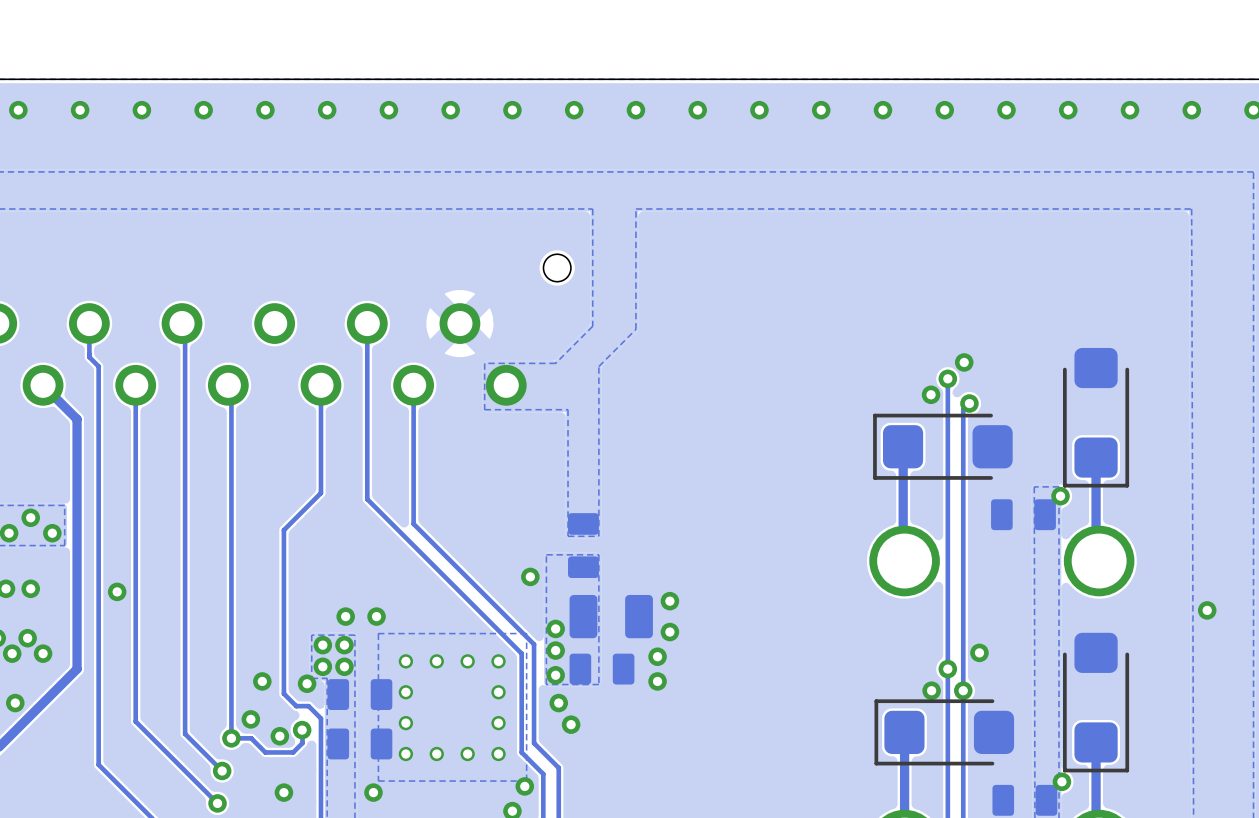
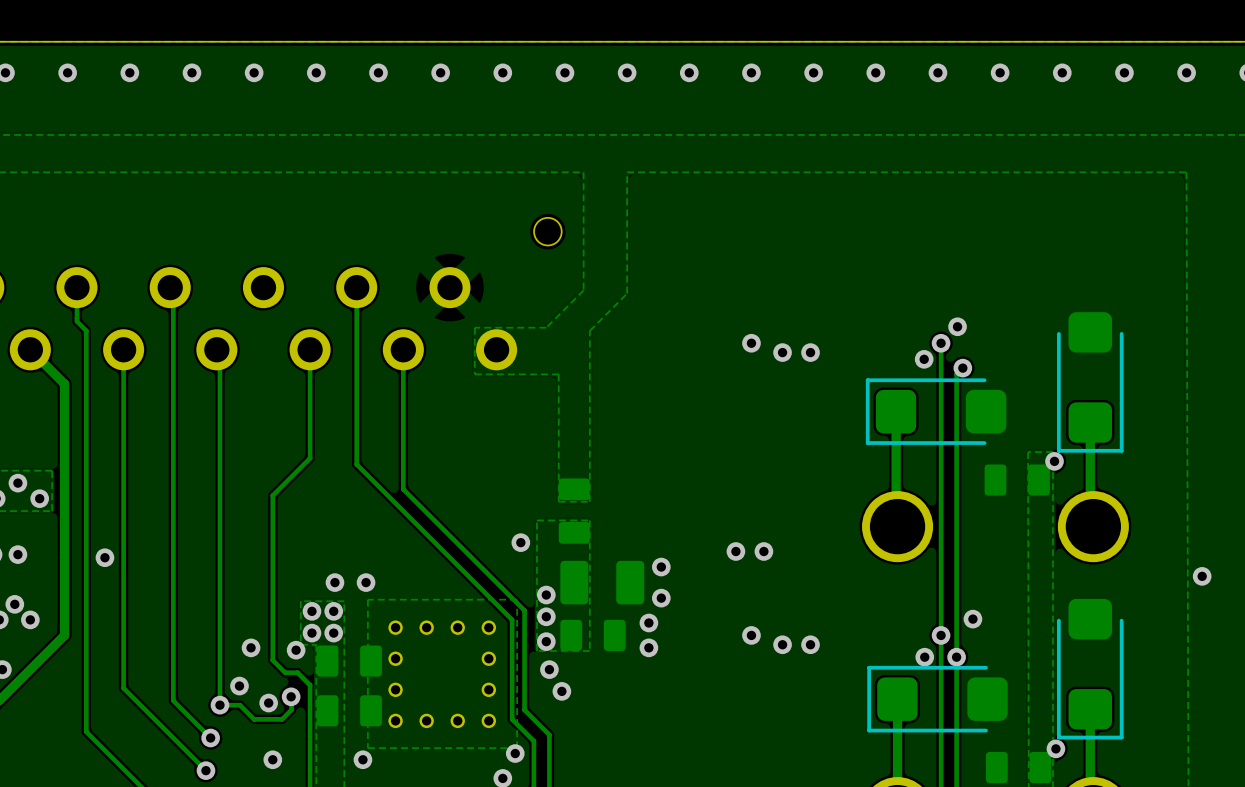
via: none -> (751, 343)
via: none -> (782, 352)
via: none -> (810, 352)
via: none -> (735, 551)
via: none -> (763, 551)
via: none -> (751, 635)
via: none -> (782, 644)
via: none -> (810, 644)

